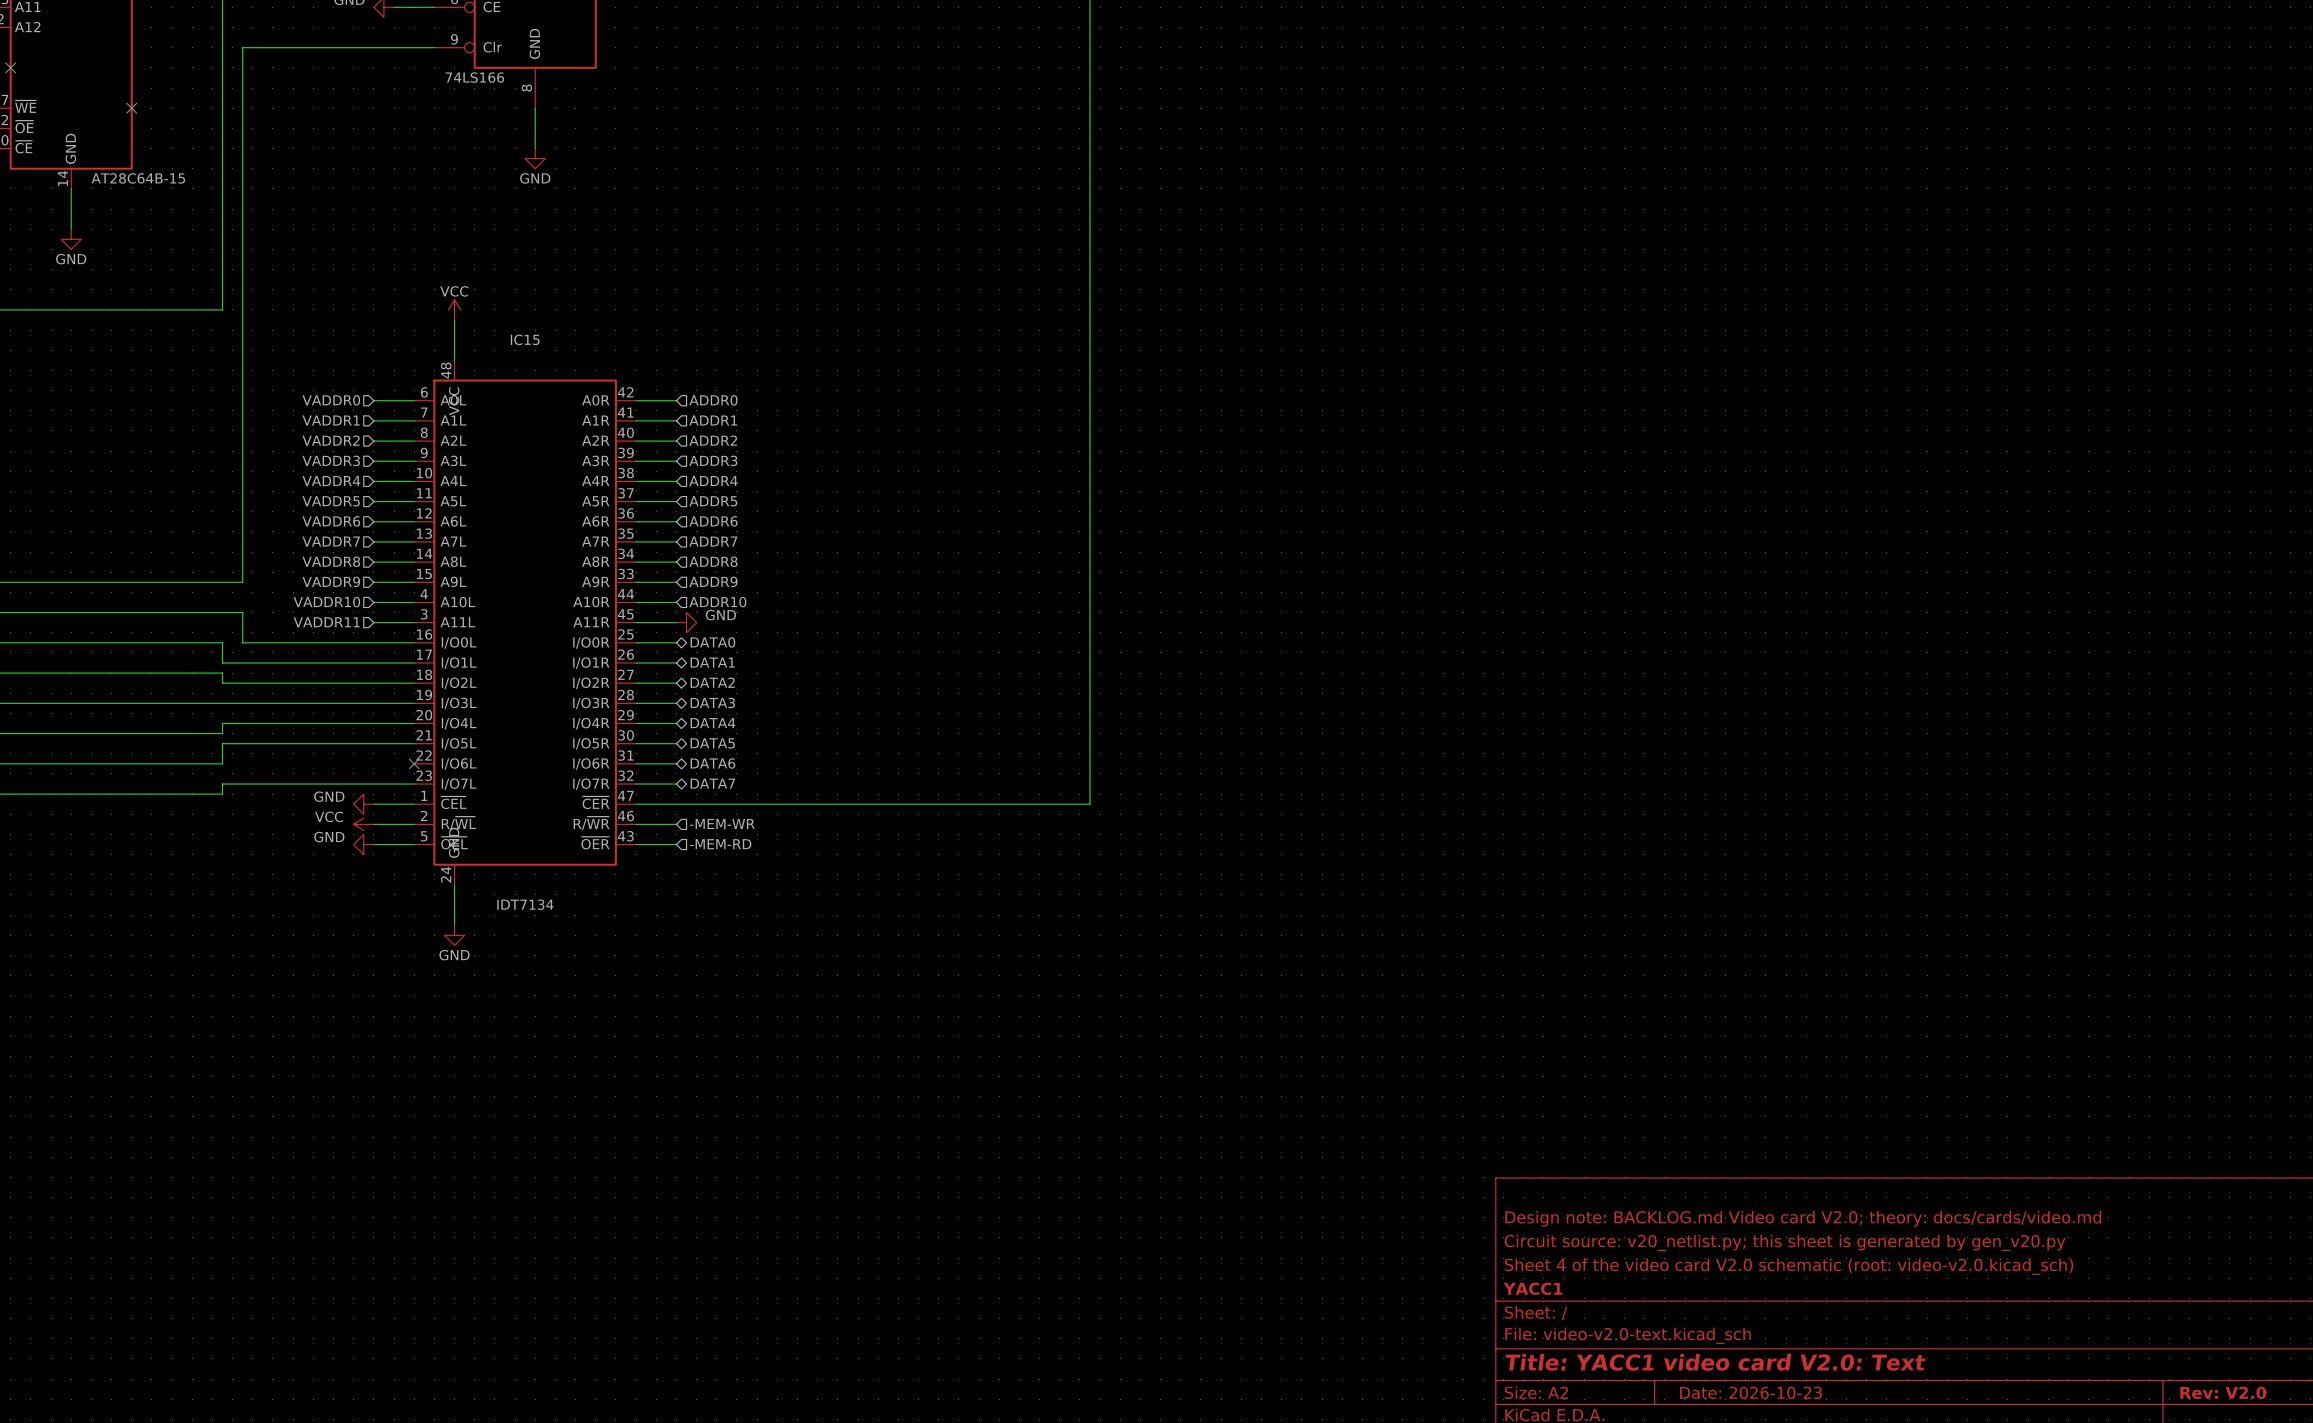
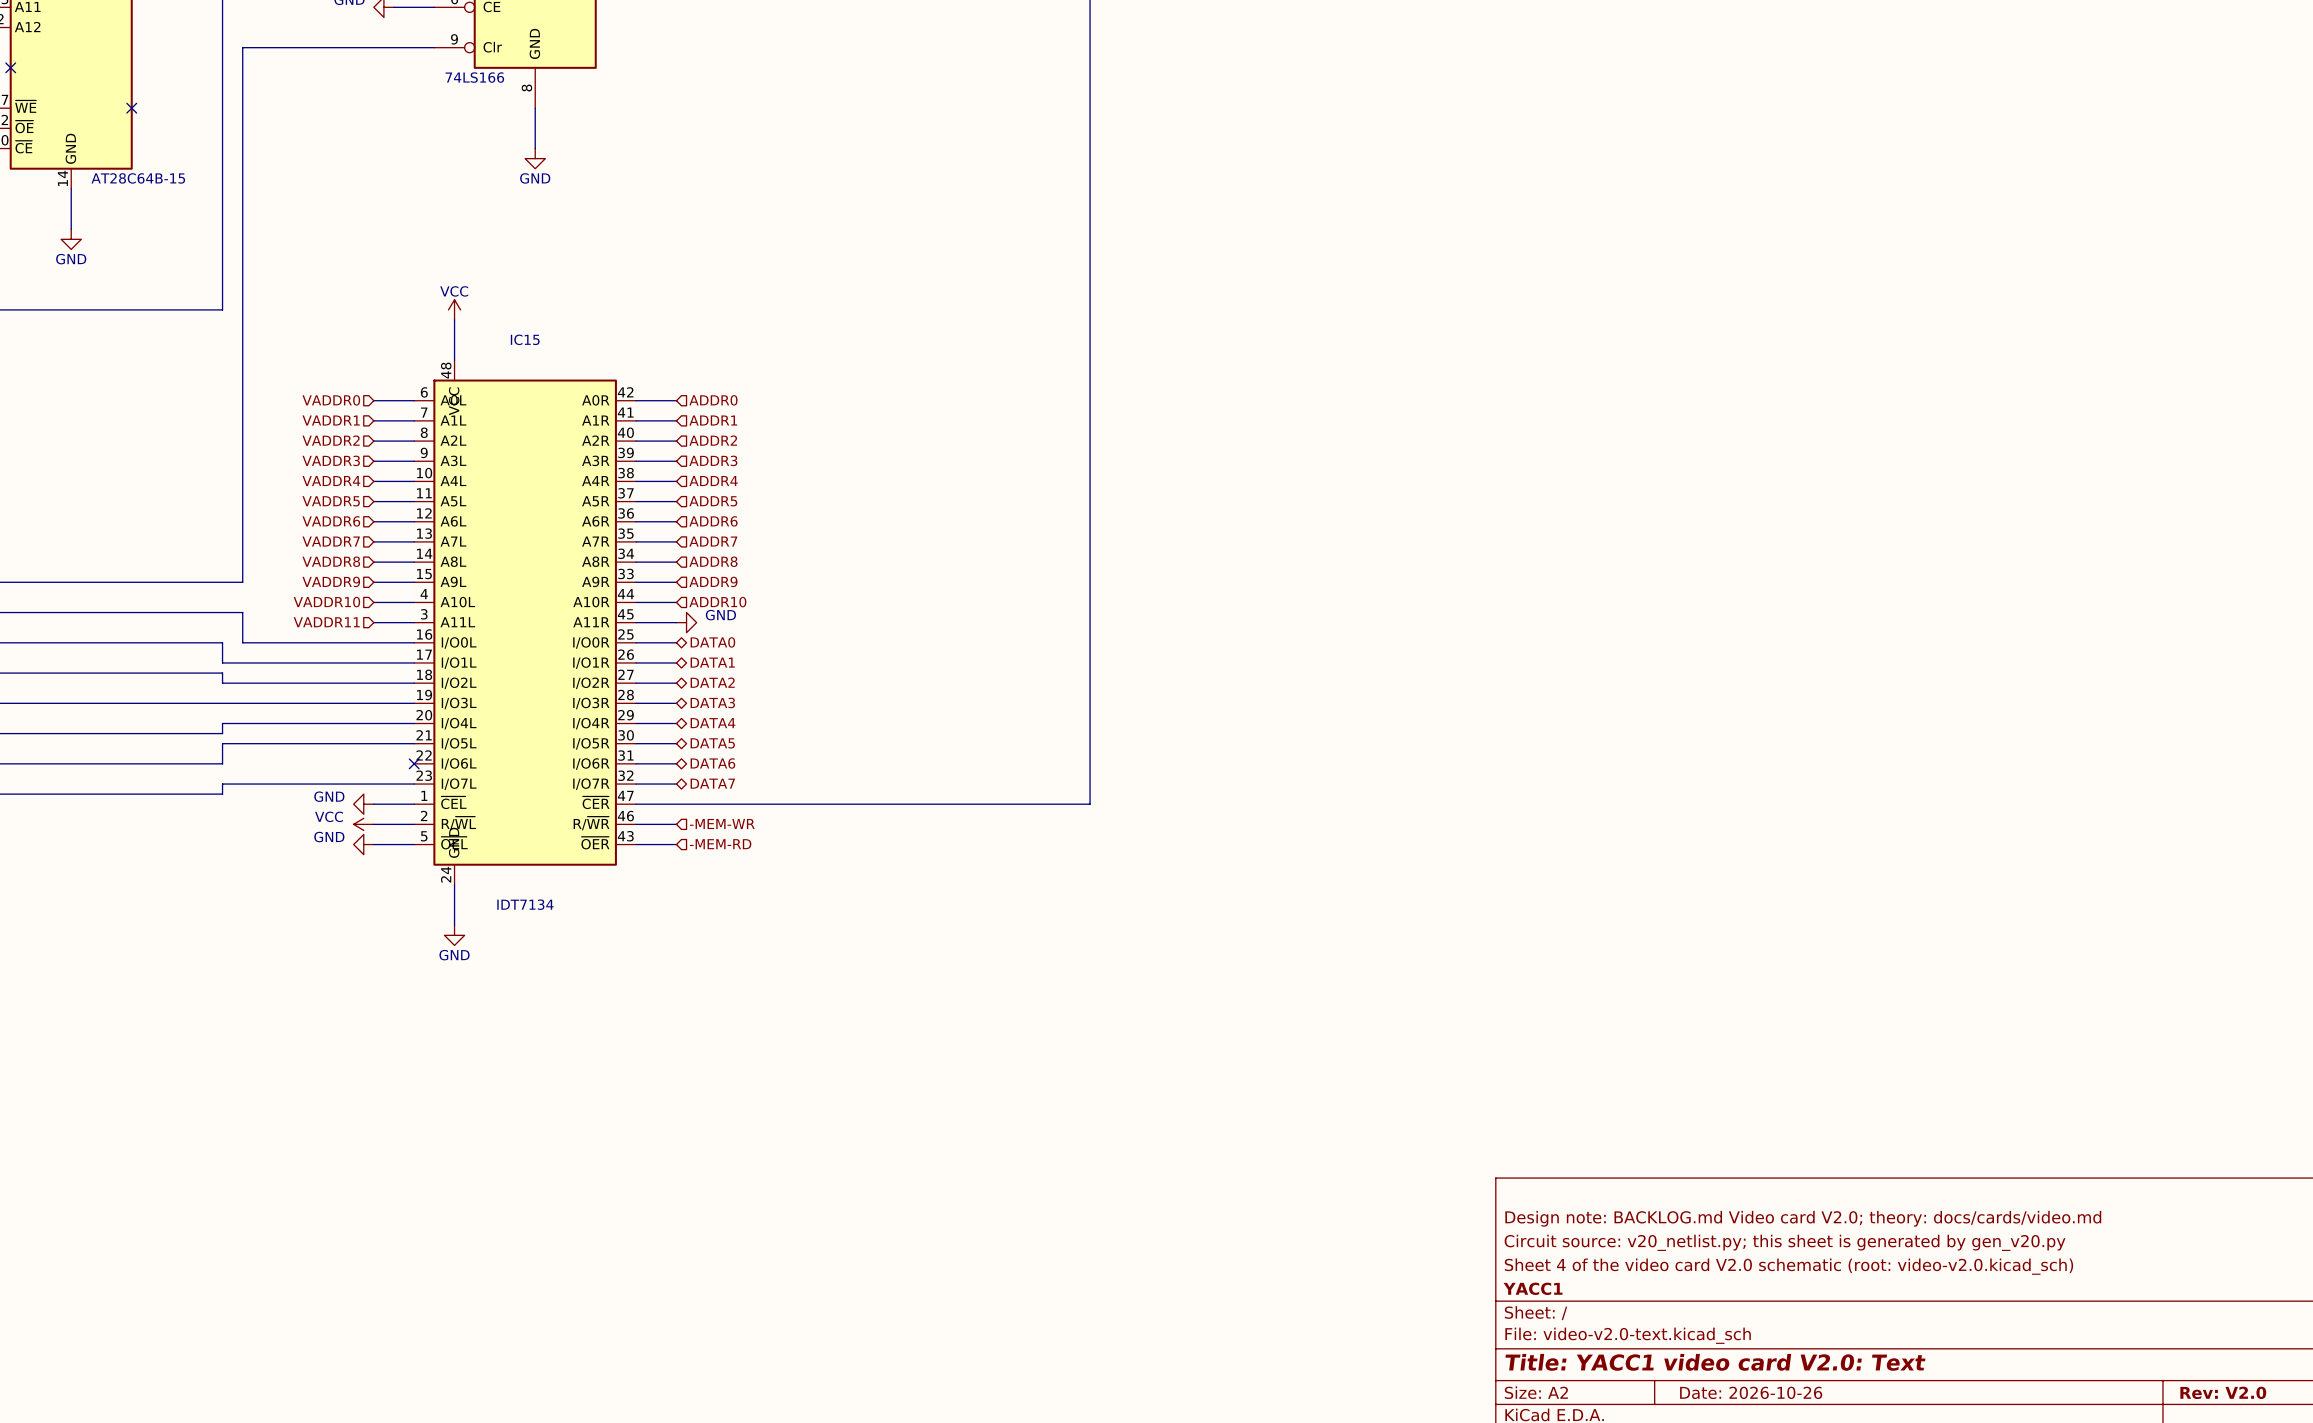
title block: Date: 2026-10-23 (1751, 1392) -> Date: 2026-10-26 (1751, 1392)

